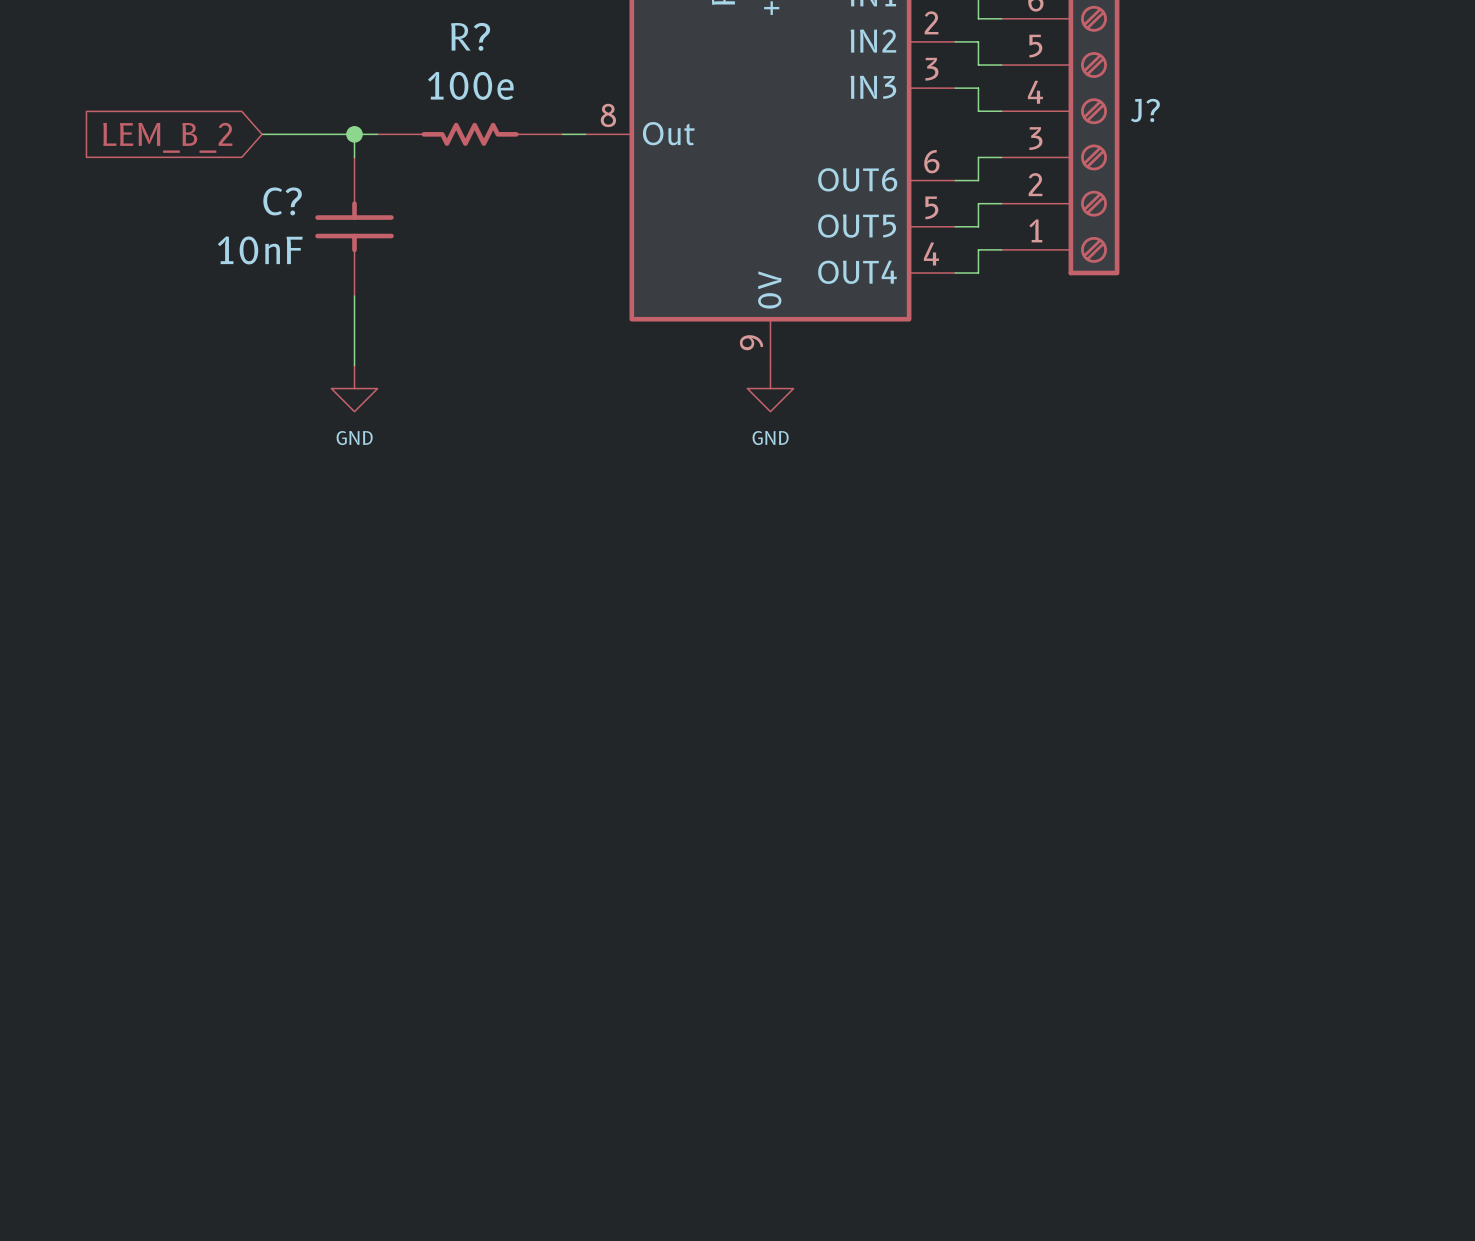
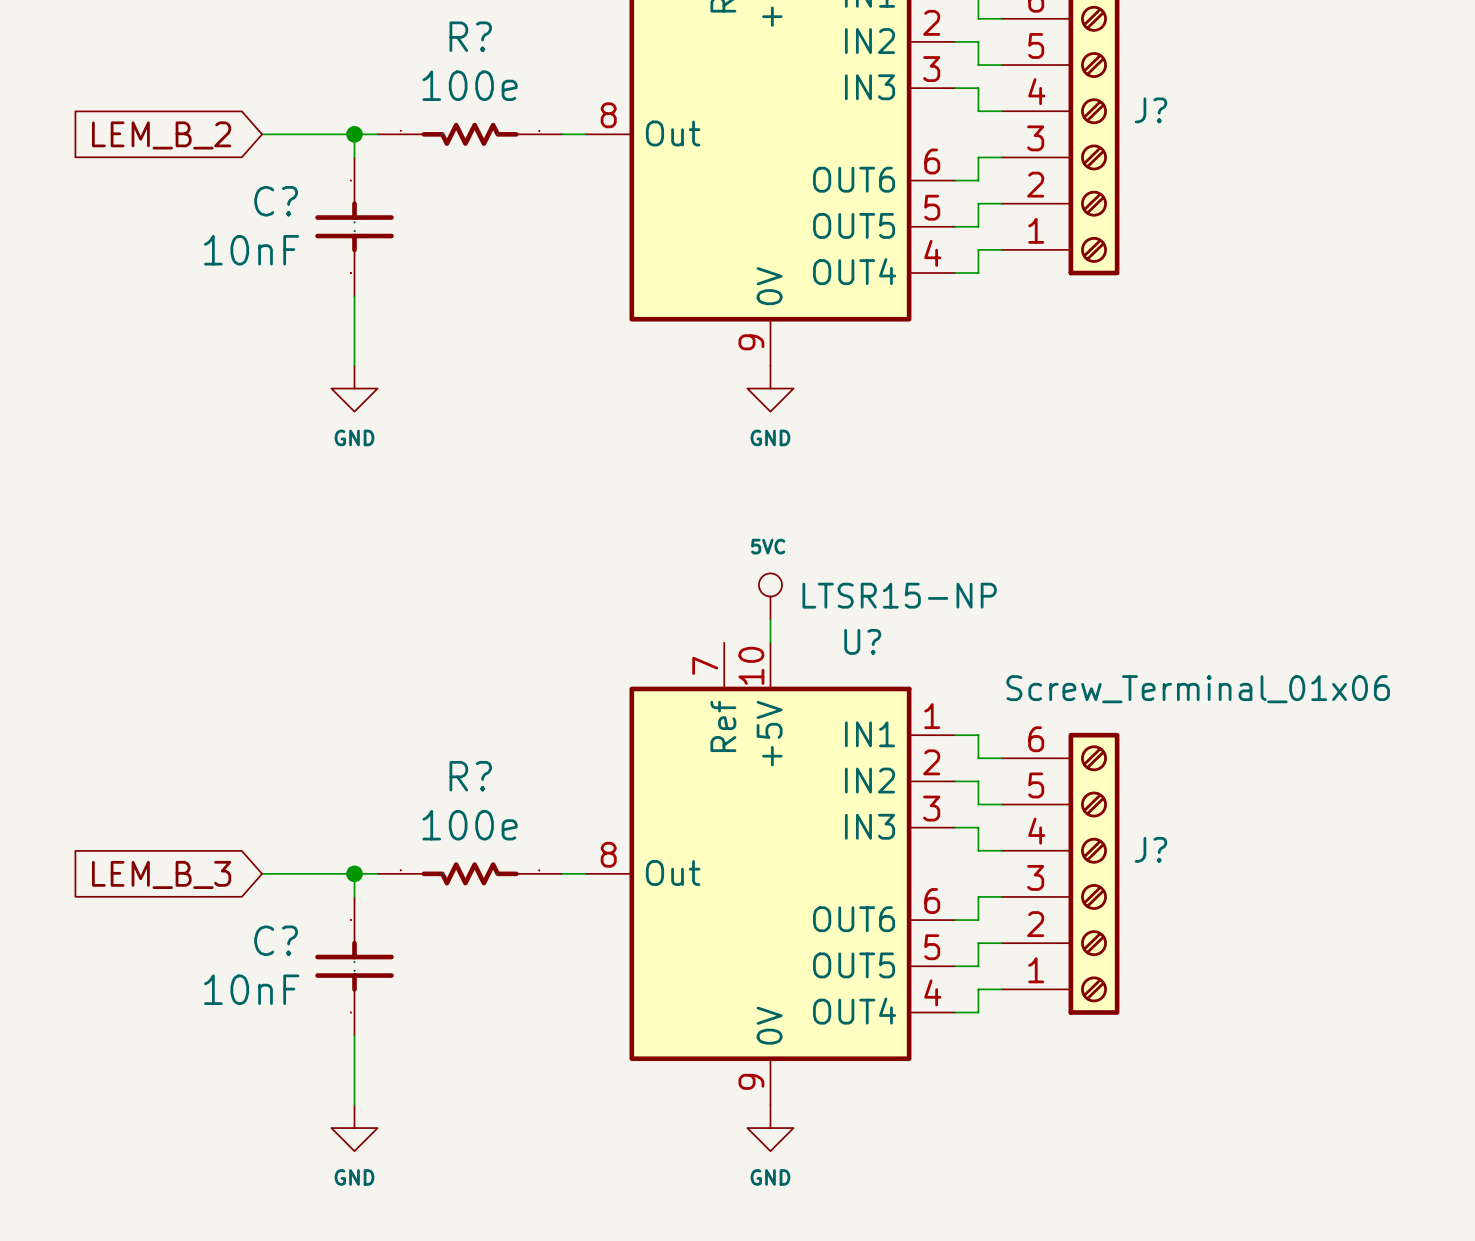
power symbol: none -> 5VC (770, 596)
wire: none -> (770, 619) (770, 642)
wire: none -> (955, 735) (978, 735) (978, 758) (1001, 758)
wire: none -> (955, 781) (978, 781) (978, 804) (1001, 804)
wire: none -> (955, 827) (978, 827) (978, 850) (1001, 850)
wire: none -> (262, 873) (377, 873)
wire: none -> (354, 873) (354, 896)
junction: none -> (354, 873)
R?: none -> 100e (470, 873)
wire: none -> (562, 873) (585, 873)
U?: none -> LTSR15-NP (770, 873)
J?: none -> Screw_Terminal_01x06 (1060, 873)
global label: none -> LEM_B_3 (161, 874)
wire: none -> (1001, 896) (978, 896) (978, 920) (955, 920)
wire: none -> (1001, 943) (978, 943) (978, 966) (955, 966)
C?: none -> 10nF (354, 966)
wire: none -> (1001, 989) (978, 989) (978, 1012) (955, 1012)
wire: none -> (354, 1035) (354, 1104)
power symbol: none -> GND (354, 1128)
power symbol: none -> GND (770, 1128)

